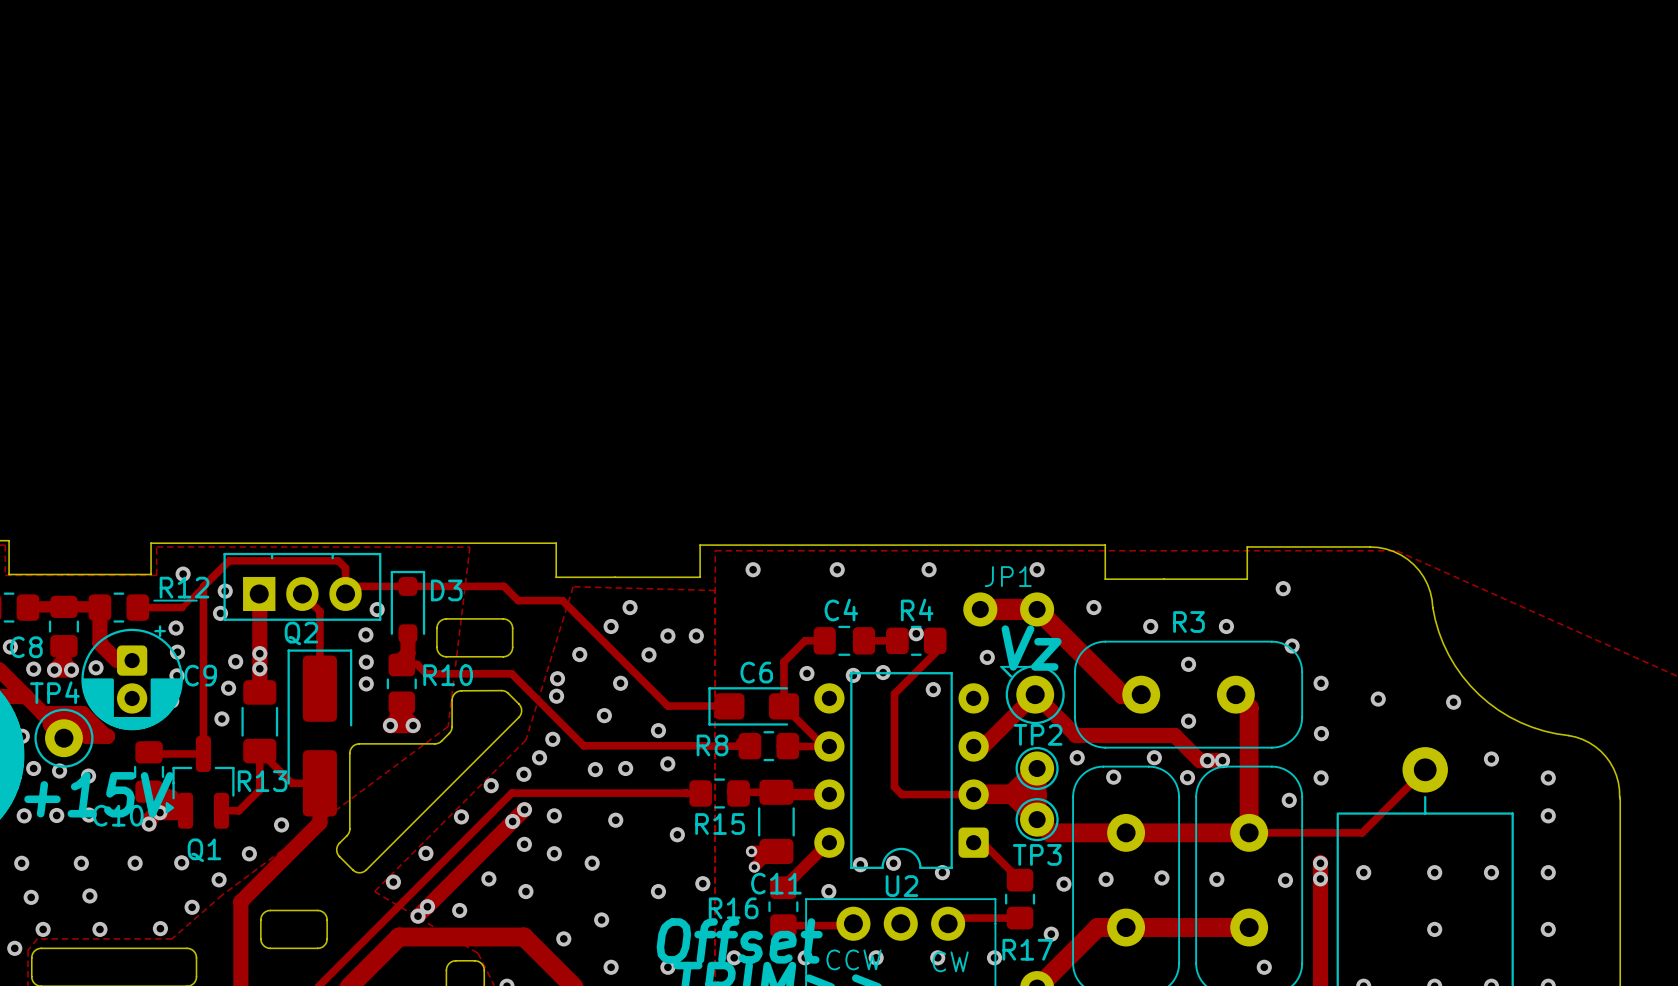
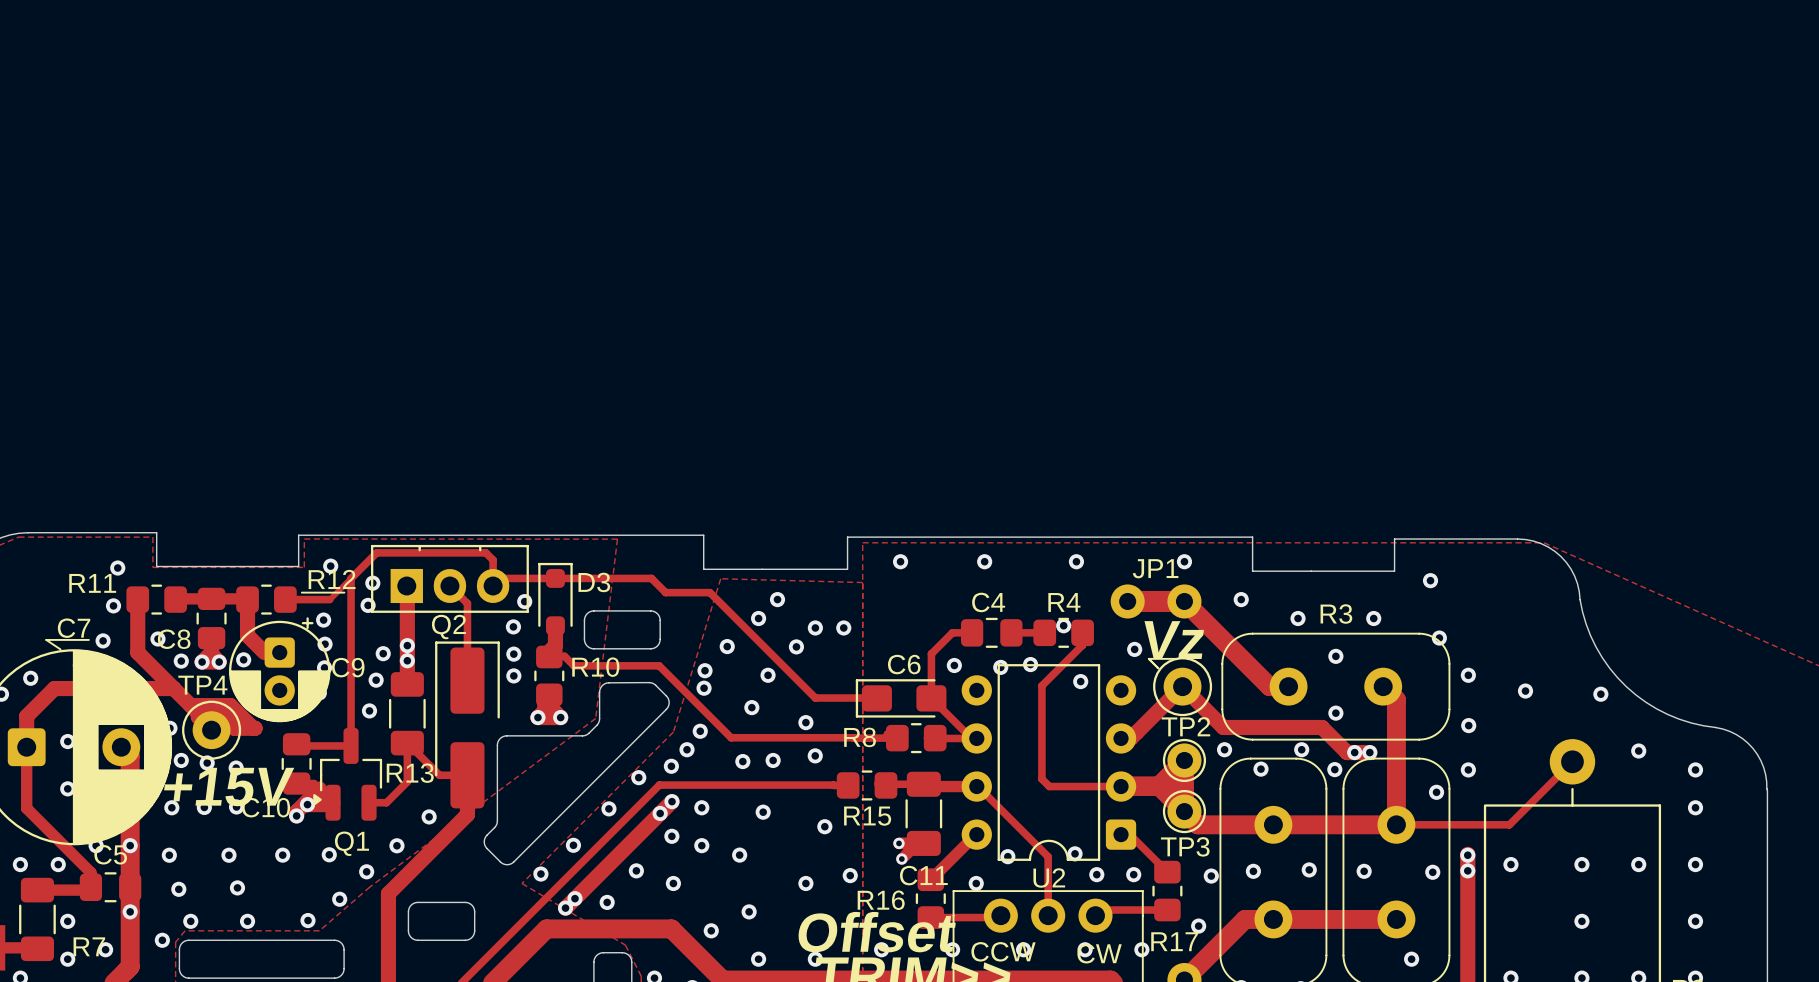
track: none -> (976, 786) (1048, 856) (1048, 915)
via: none -> (1075, 853)
via: (893, 863) -> none
via: (942, 872) -> none
via: none -> (1096, 874)
via: none -> (1133, 874)

